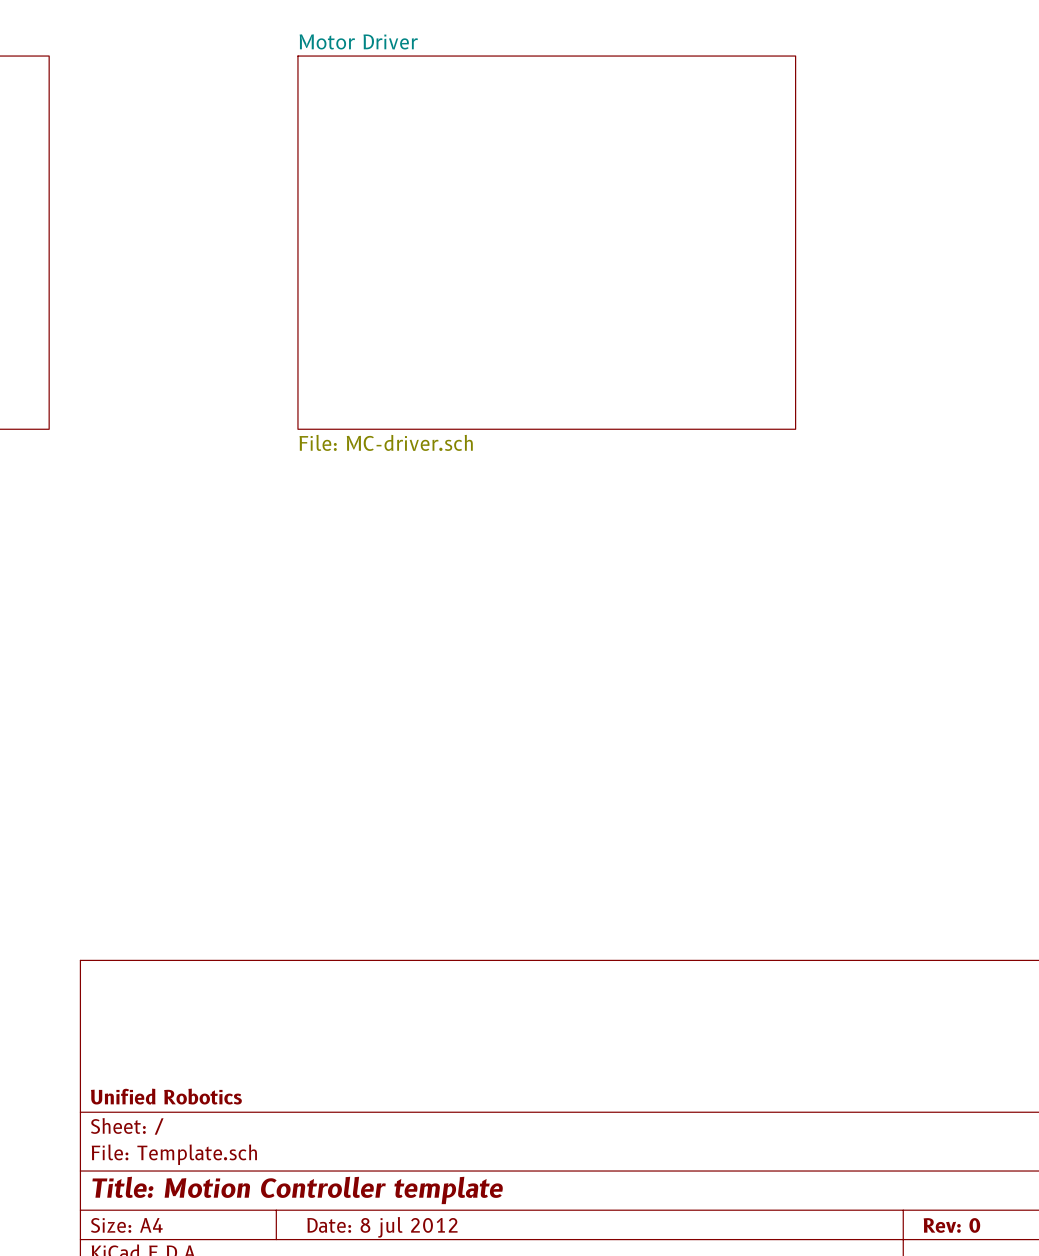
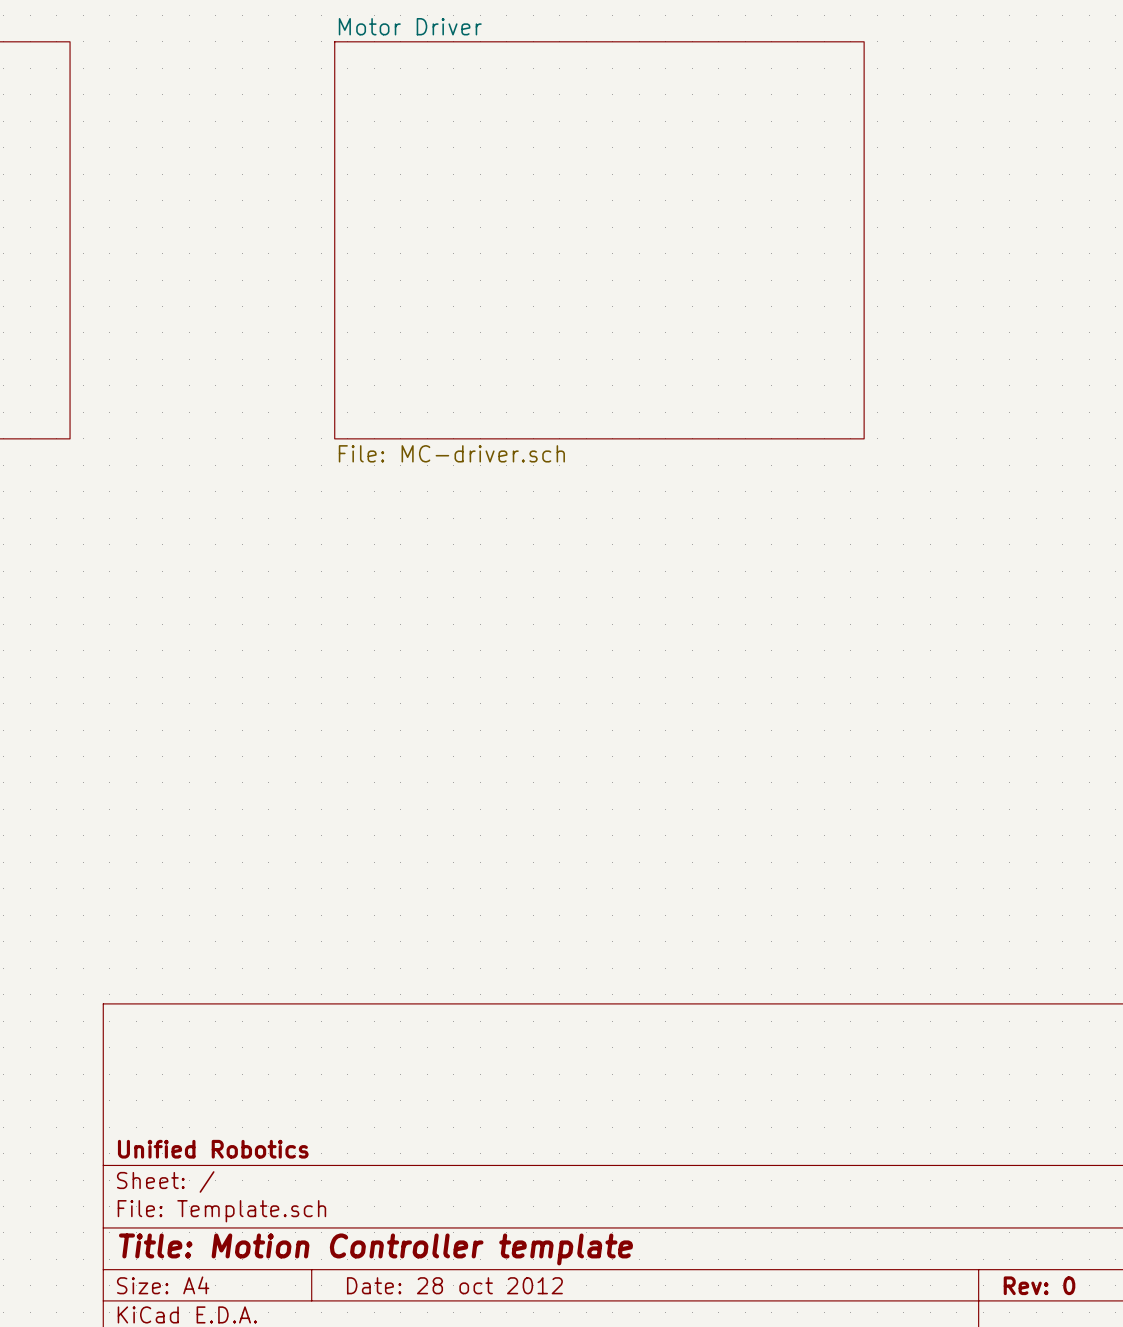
title block: Date: 8 jul 2012 (382, 1227) -> Date: 28 oct 2012 (454, 1285)

